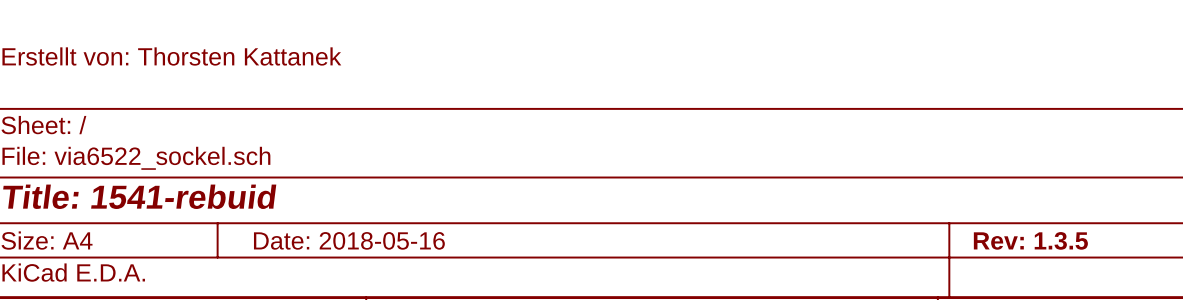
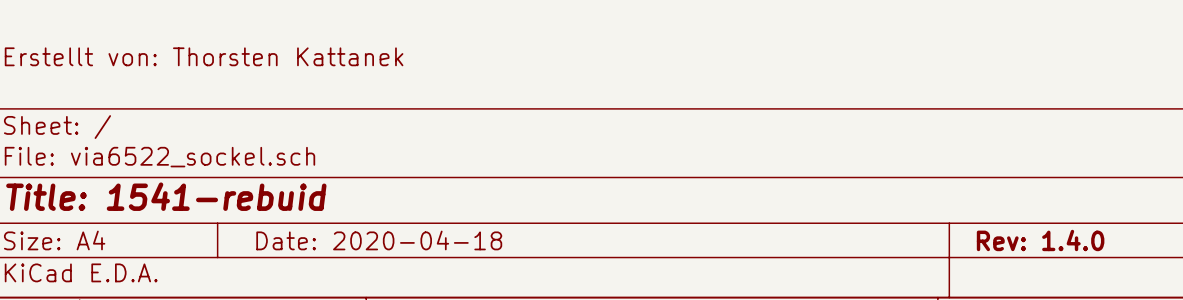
title block: Date: 2018-05-16 (349, 240) -> Date: 2020-04-18 (379, 240)
title block: Rev: 1.3.5 (1030, 240) -> Rev: 1.4.0 (1040, 240)

